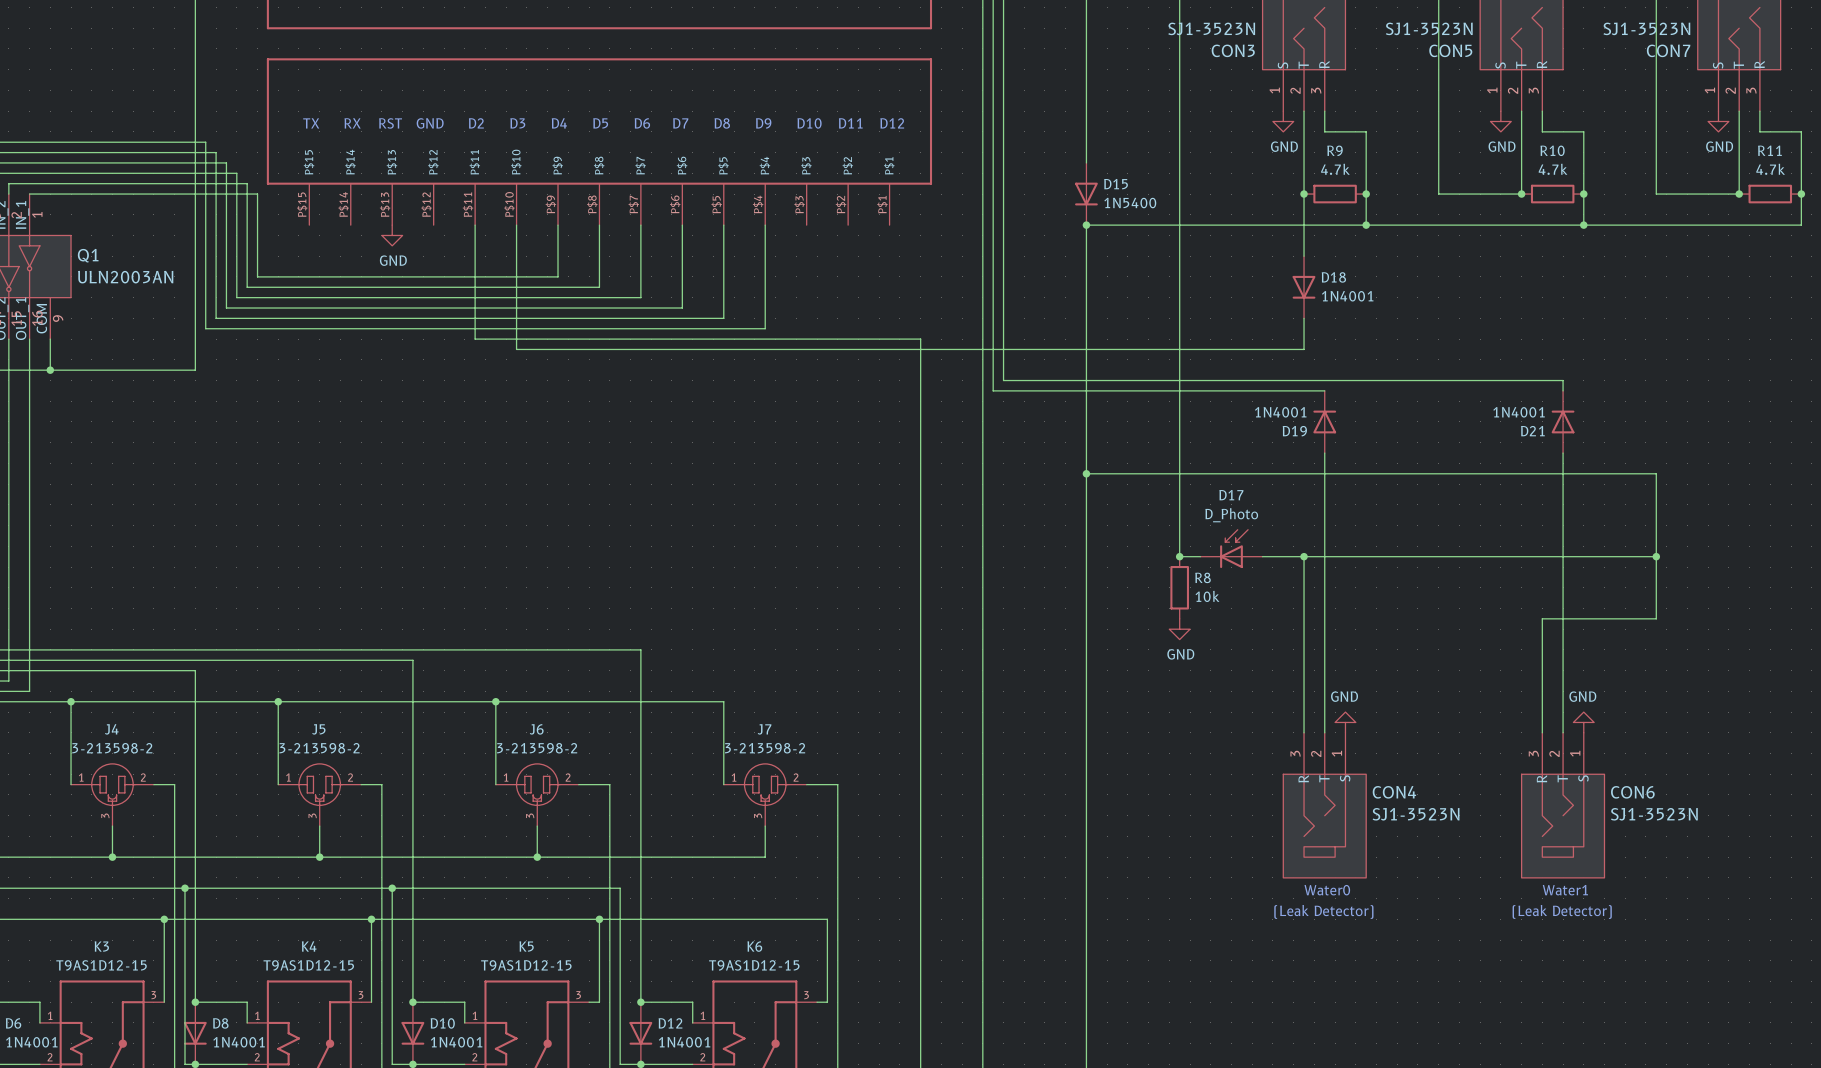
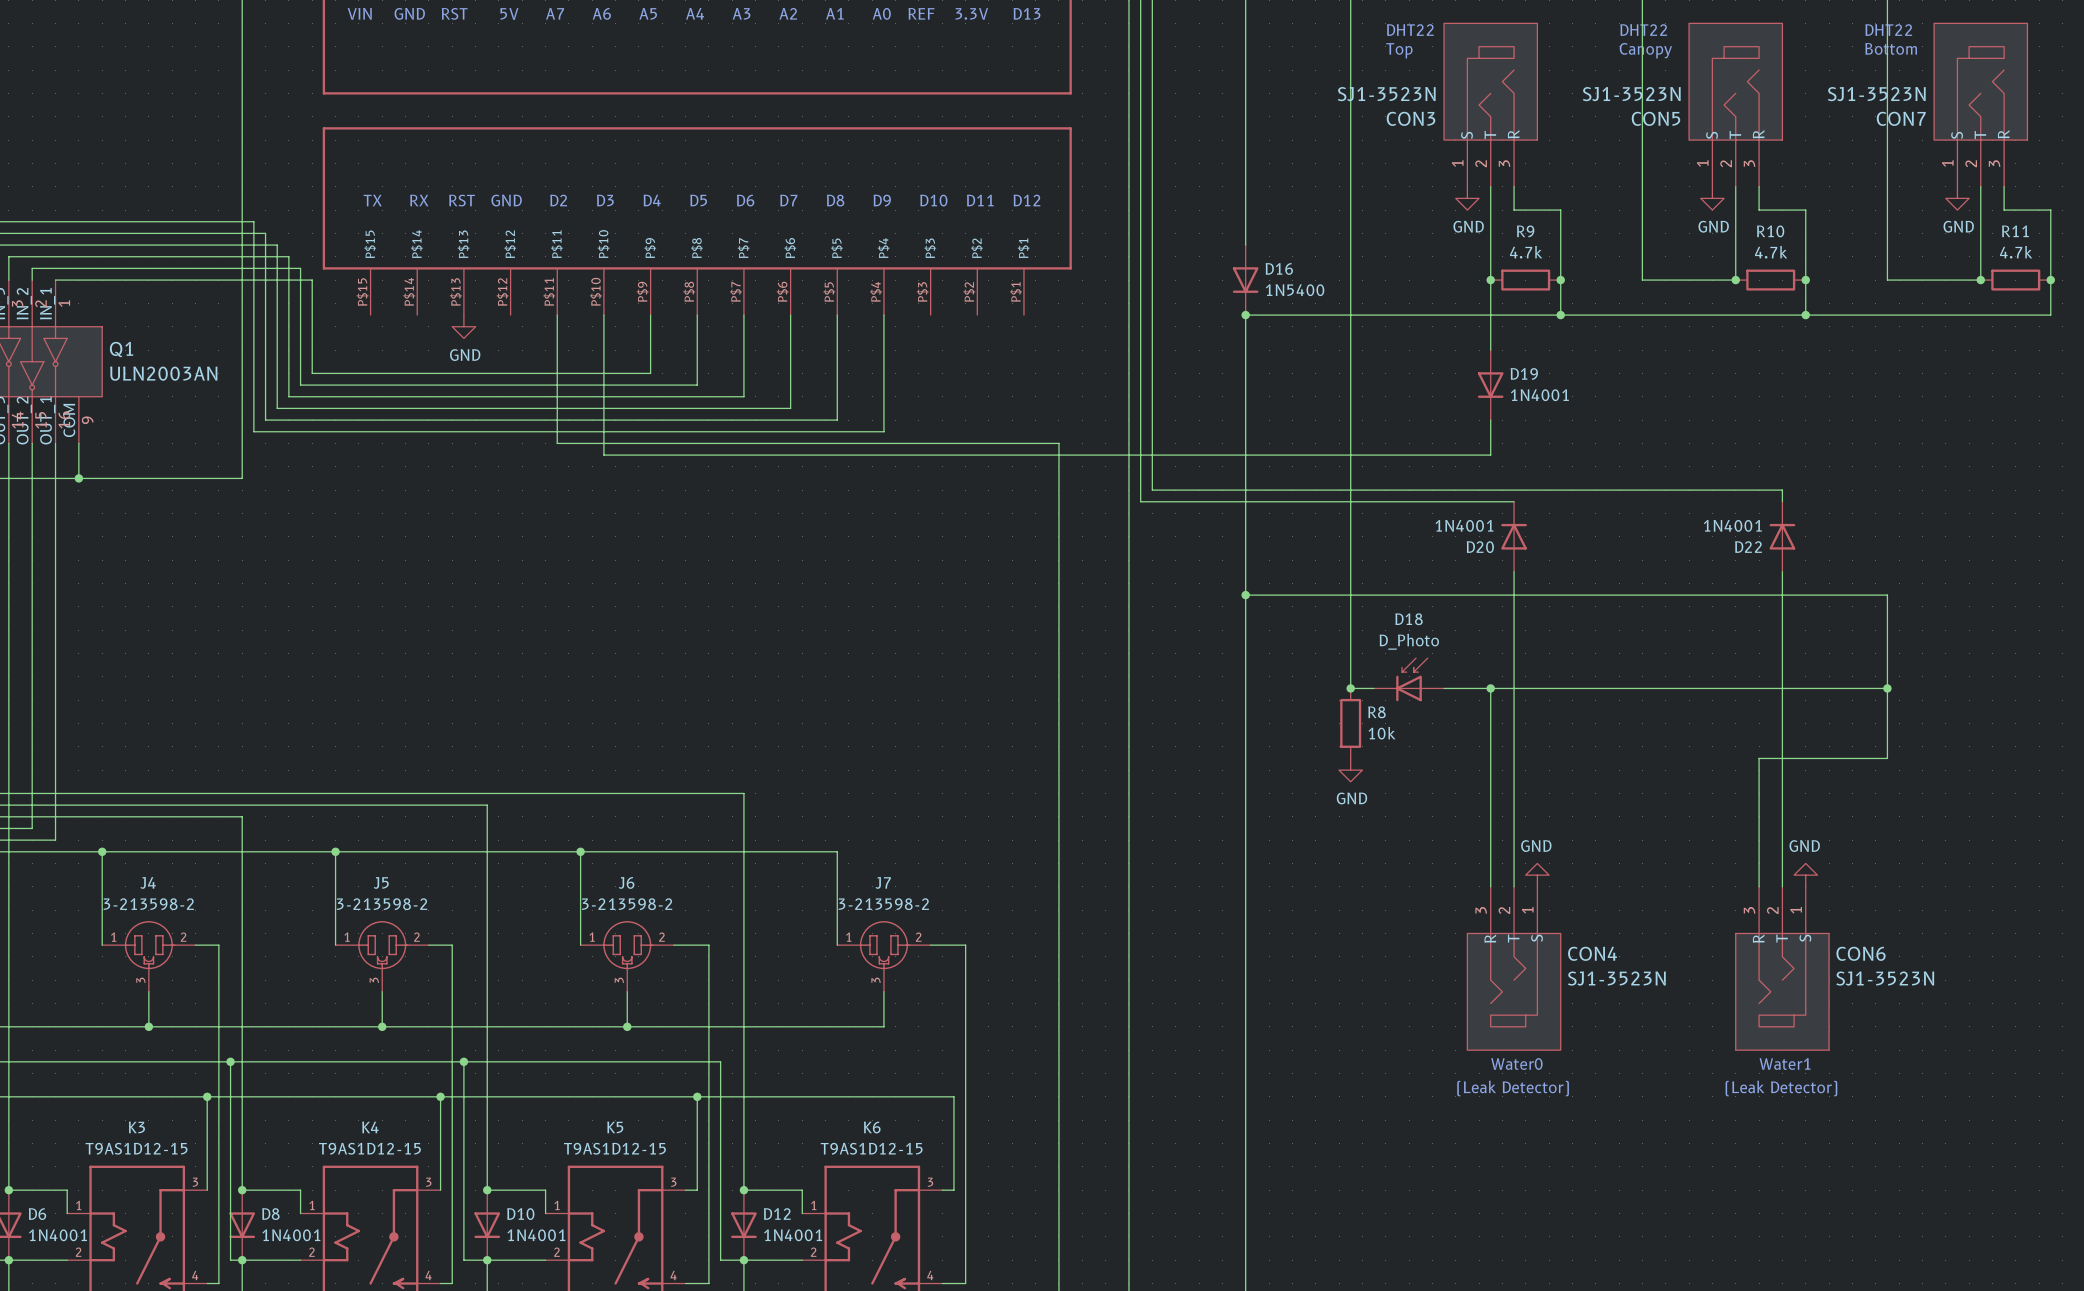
D15 name: D15 (1116, 184) -> D16 (1279, 268)
D18 name: D18 (1333, 277) -> D19 (1524, 373)
D19 name: D19 (1294, 431) -> D20 (1480, 547)
D21 name: D21 (1532, 431) -> D22 (1748, 547)
D17 name: D17 (1231, 495) -> D18 (1409, 619)

